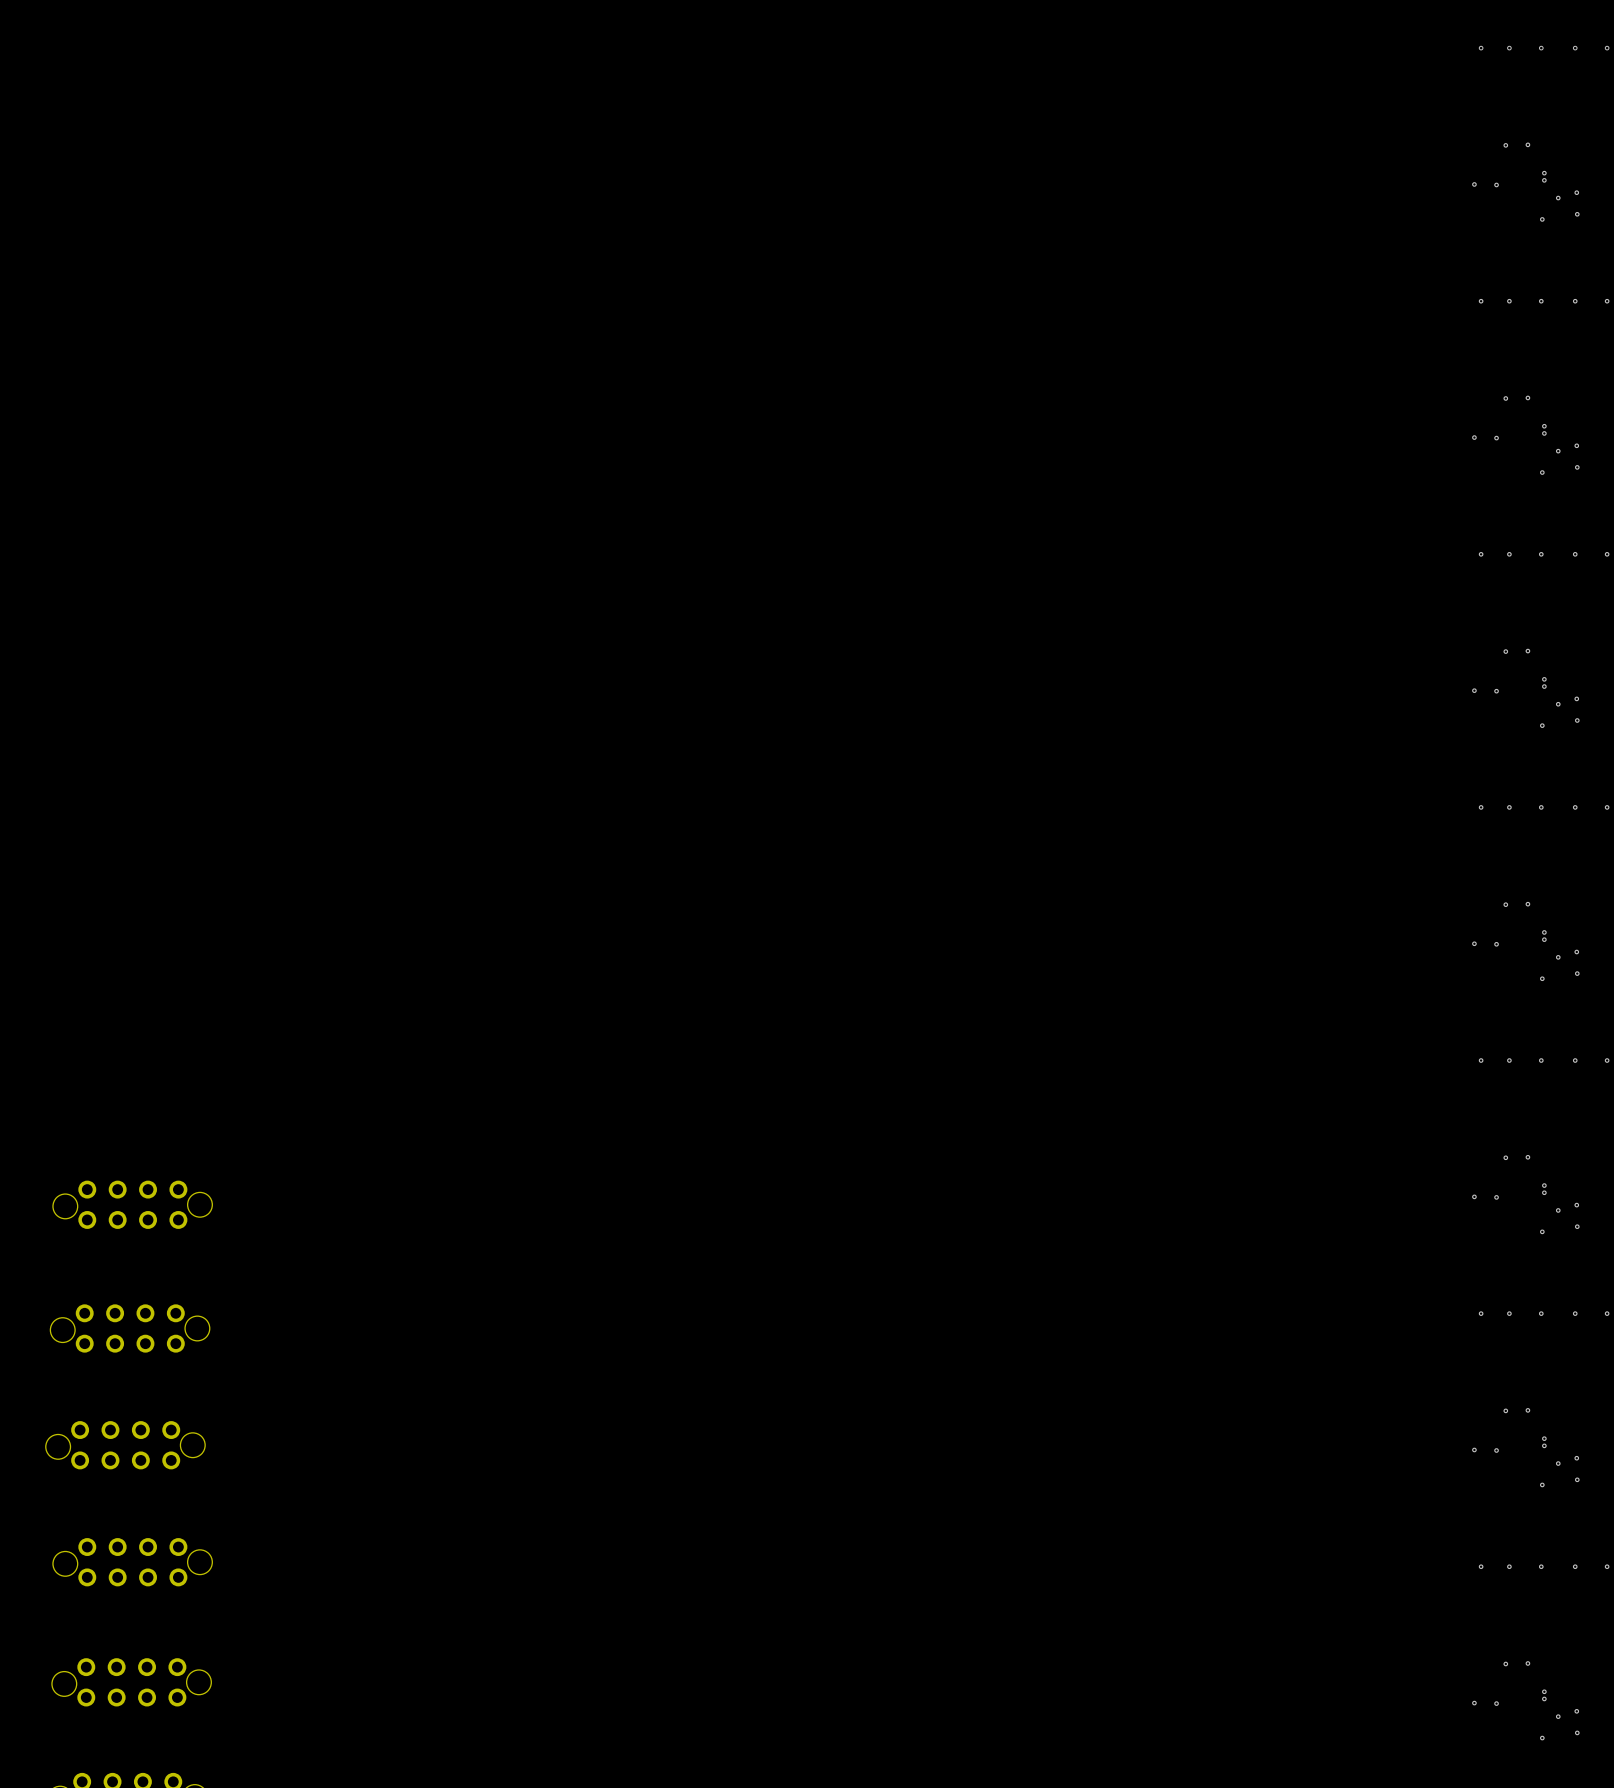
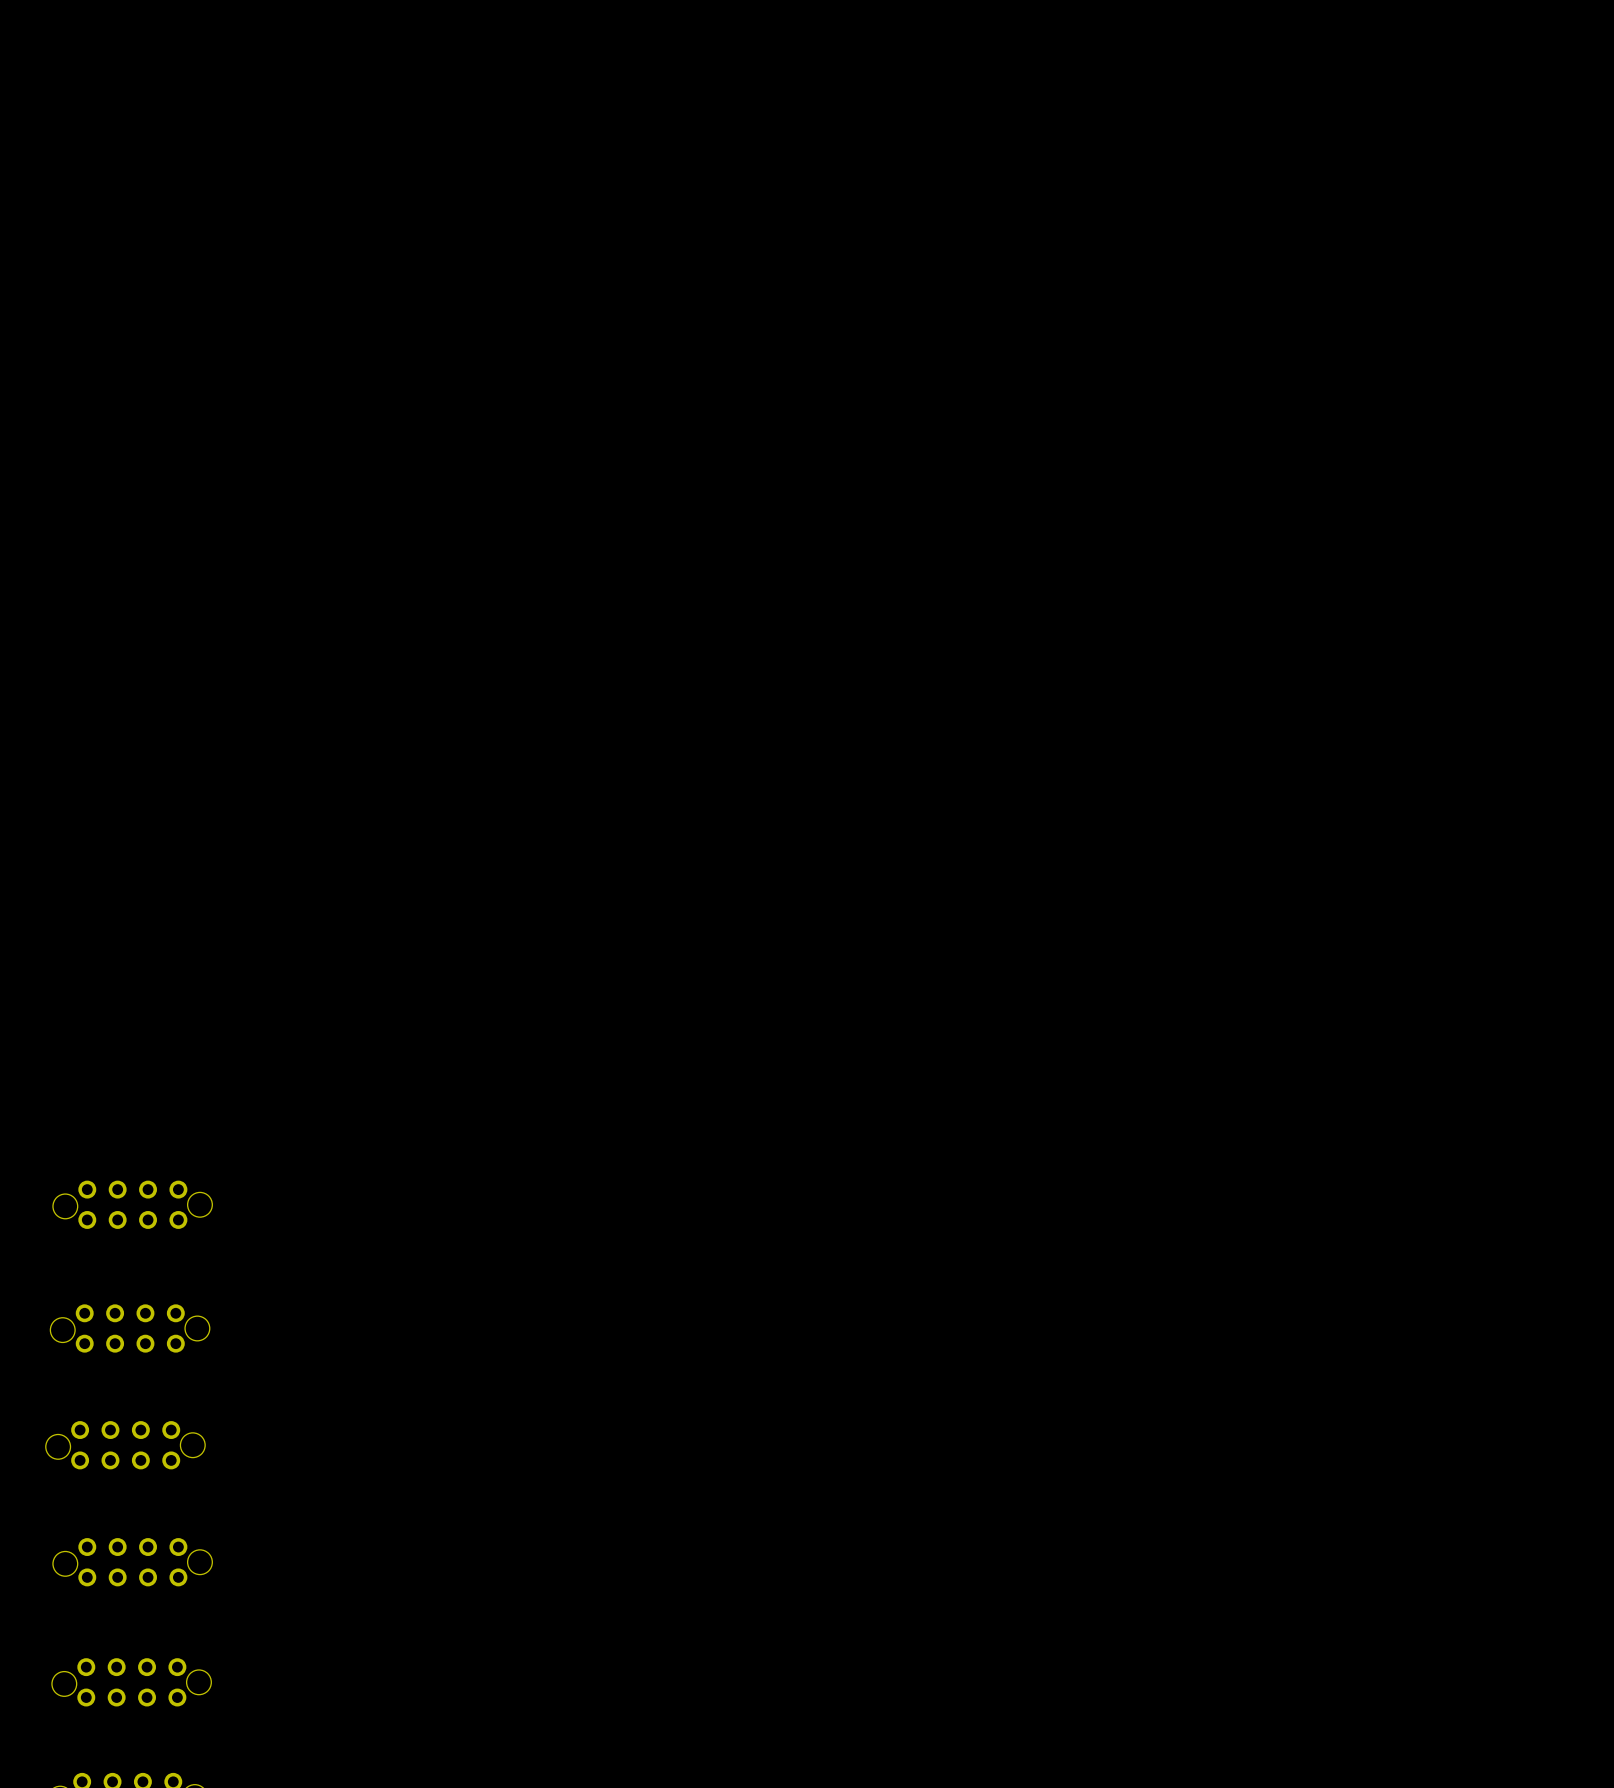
via: (1481, 48) -> none
via: (1509, 48) -> none
via: (1541, 48) -> none
via: (1575, 48) -> none
via: (1607, 48) -> none
via: (1527, 144) -> none
via: (1505, 145) -> none
via: (1544, 173) -> none
via: (1544, 180) -> none
via: (1474, 184) -> none
via: (1496, 184) -> none
via: (1576, 192) -> none
via: (1558, 198) -> none
via: (1577, 214) -> none
via: (1542, 219) -> none
via: (1481, 301) -> none
via: (1509, 301) -> none
via: (1541, 301) -> none
via: (1575, 301) -> none
via: (1607, 301) -> none
via: (1527, 397) -> none
via: (1505, 398) -> none
via: (1544, 426) -> none
via: (1544, 433) -> none
via: (1474, 437) -> none
via: (1496, 438) -> none
via: (1576, 445) -> none
via: (1558, 451) -> none
via: (1577, 467) -> none
via: (1542, 472) -> none
via: (1481, 554) -> none
via: (1509, 554) -> none
via: (1541, 554) -> none
via: (1575, 554) -> none
via: (1607, 554) -> none
via: (1505, 651) -> none
via: (1527, 651) -> none
via: (1544, 679) -> none
via: (1544, 686) -> none
via: (1474, 690) -> none
via: (1496, 691) -> none
via: (1576, 698) -> none
via: (1558, 704) -> none
via: (1577, 720) -> none
via: (1542, 725) -> none
via: (1481, 807) -> none
via: (1509, 807) -> none
via: (1541, 807) -> none
via: (1575, 807) -> none
via: (1607, 807) -> none
via: (1505, 904) -> none
via: (1527, 904) -> none
via: (1544, 932) -> none
via: (1544, 939) -> none
via: (1474, 943) -> none
via: (1496, 944) -> none
via: (1576, 952) -> none
via: (1558, 957) -> none
via: (1577, 973) -> none
via: (1542, 978) -> none
via: (1481, 1060) -> none
via: (1509, 1060) -> none
via: (1541, 1060) -> none
via: (1575, 1060) -> none
via: (1607, 1060) -> none
via: (1505, 1157) -> none
via: (1527, 1157) -> none
via: (1544, 1185) -> none
via: (1544, 1192) -> none
via: (1474, 1196) -> none
via: (1496, 1197) -> none
via: (1576, 1205) -> none
via: (1558, 1210) -> none
via: (1577, 1226) -> none
via: (1542, 1231) -> none
via: (1481, 1313) -> none
via: (1509, 1313) -> none
via: (1541, 1313) -> none
via: (1575, 1313) -> none
via: (1607, 1313) -> none
via: (1505, 1410) -> none
via: (1527, 1410) -> none
via: (1544, 1438) -> none
via: (1544, 1445) -> none
via: (1474, 1449) -> none
via: (1496, 1450) -> none
via: (1576, 1458) -> none
via: (1558, 1463) -> none
via: (1577, 1479) -> none
via: (1542, 1484) -> none
via: (1481, 1566) -> none
via: (1509, 1566) -> none
via: (1541, 1566) -> none
via: (1575, 1566) -> none
via: (1607, 1566) -> none
via: (1505, 1663) -> none
via: (1527, 1663) -> none
via: (1544, 1691) -> none
via: (1544, 1698) -> none
via: (1474, 1703) -> none
via: (1496, 1703) -> none
via: (1576, 1711) -> none
via: (1558, 1716) -> none
via: (1577, 1732) -> none
via: (1542, 1738) -> none

